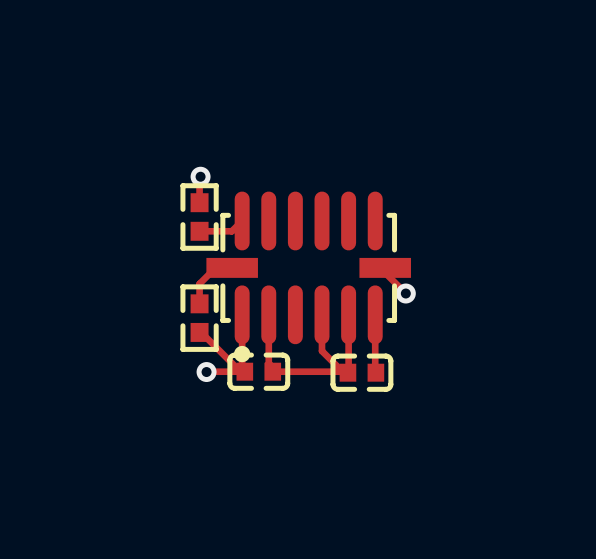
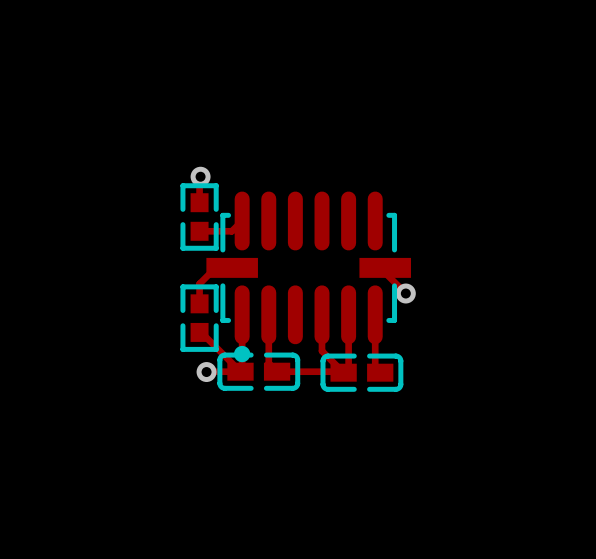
part footprint: [227, 352, 291, 391] -> [217, 352, 301, 391]
part footprint: [330, 353, 394, 392] -> [320, 353, 404, 392]

